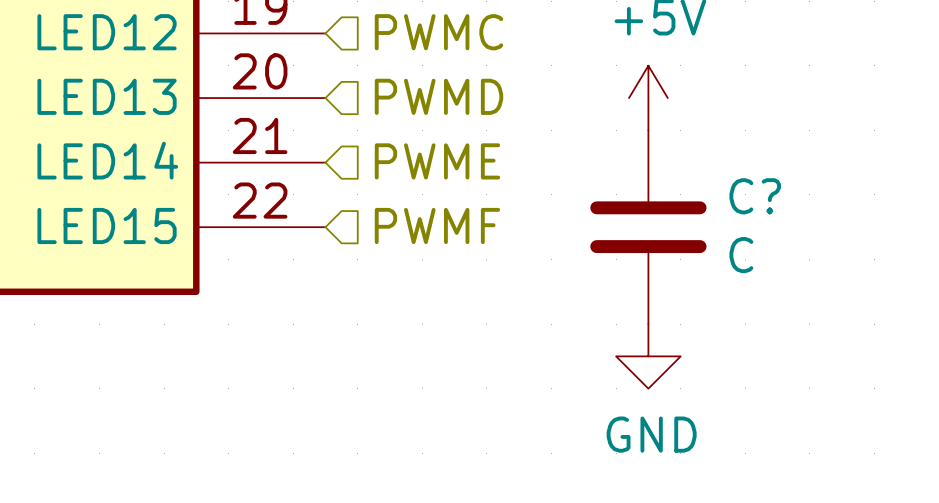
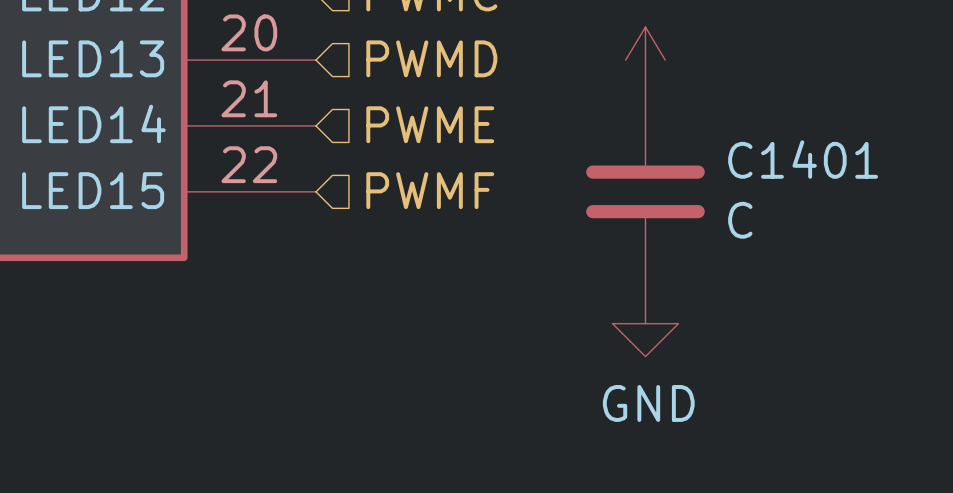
C? name: C? (755, 196) -> C1401 (803, 159)

